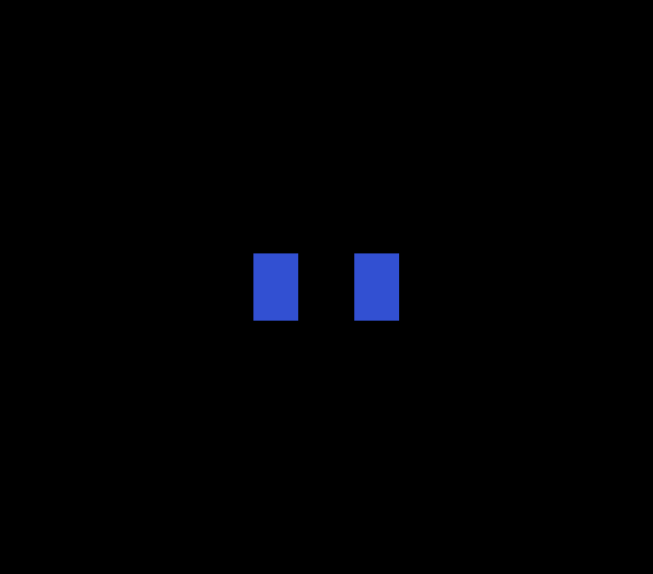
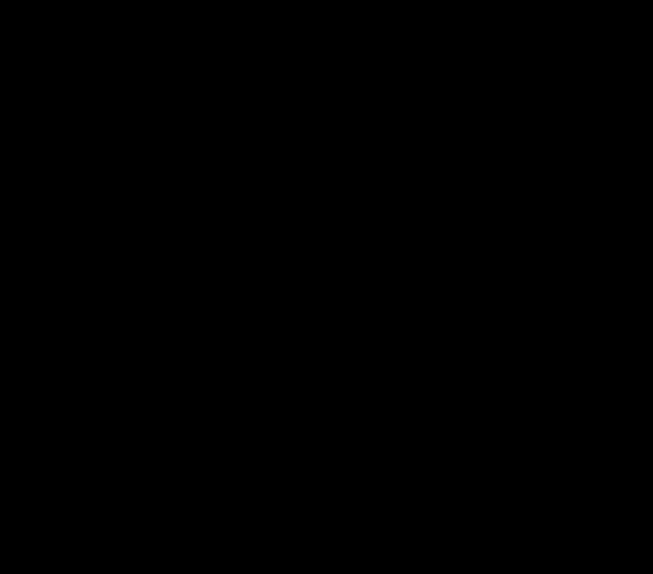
part: (326, 287) -> none

